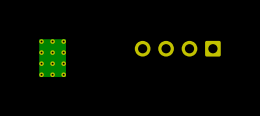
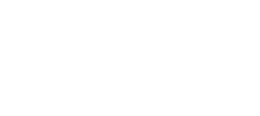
part: (177, 48) -> none
part: (52, 58) -> none

